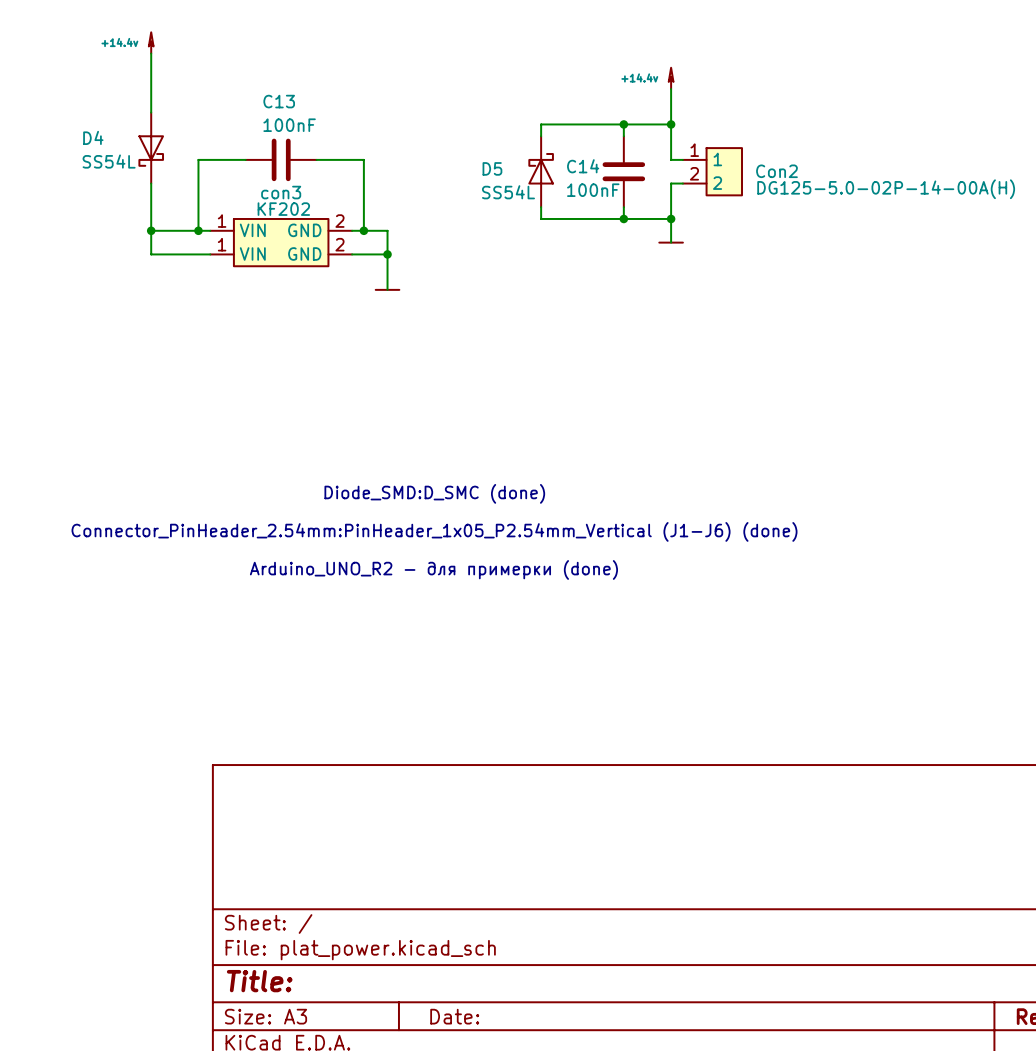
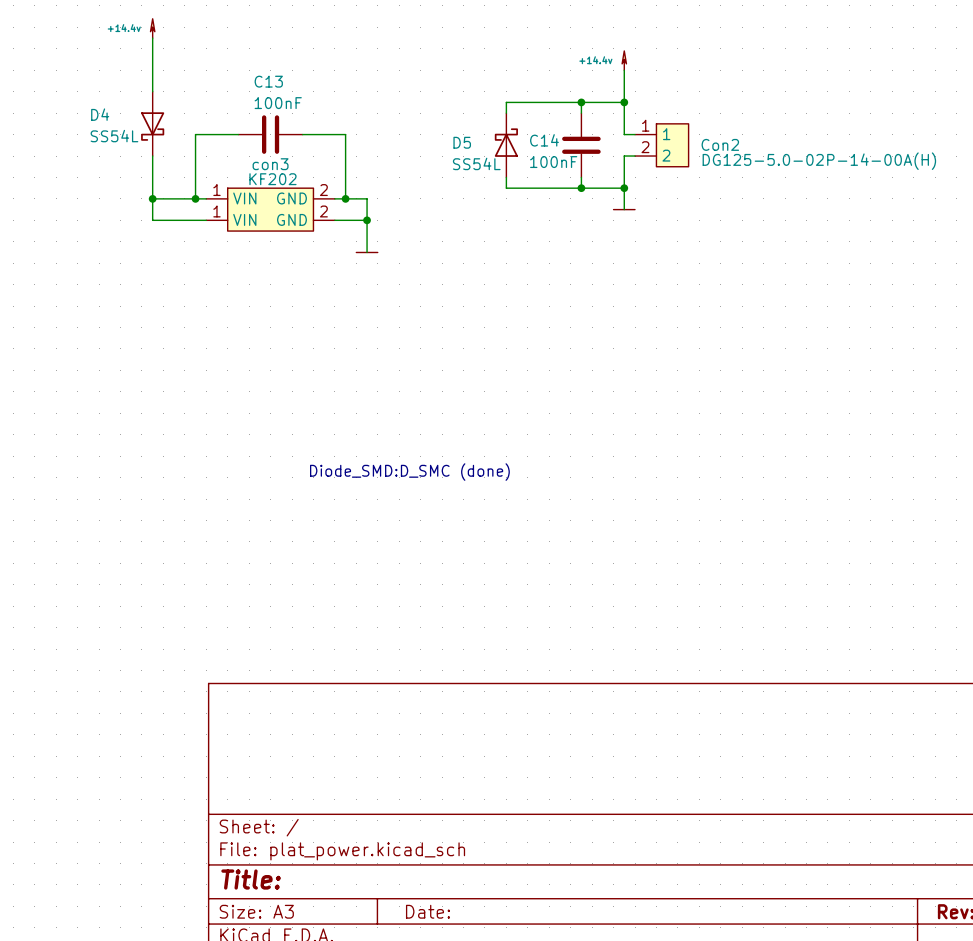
text: Diode_SMD:D_SMC (done) (434, 493) -> none
text: Connector_PinHeader_2.54mm:PinHeader_1x05_P2.54mm_Vertical (J1-J6) (done) (434, 531) -> Diode_SMD:D_SMC (done) (409, 472)
text: Arduino_UNO_R2 - для примерки (done) (433, 569) -> none

